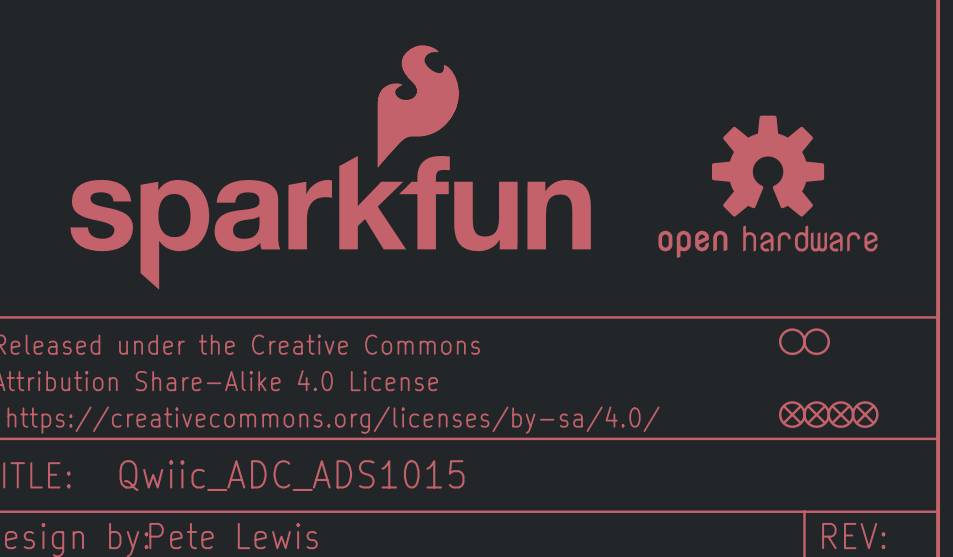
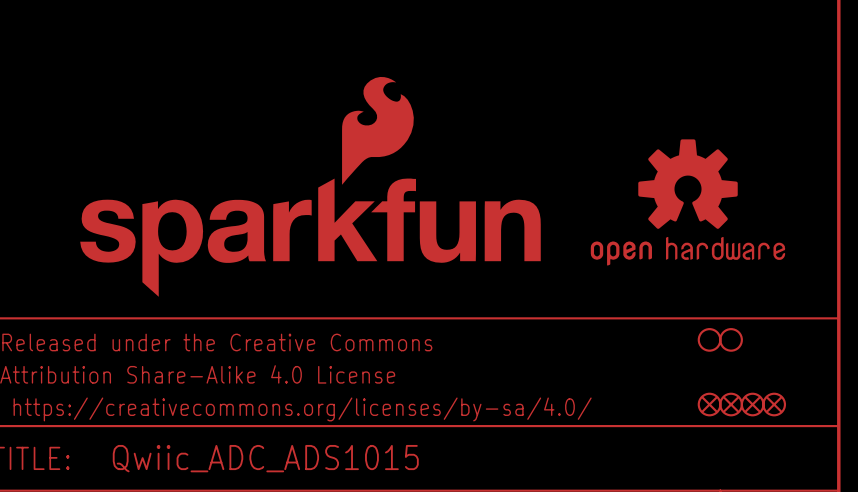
part: (330, 167) -> none
part: none -> (310, 237)

